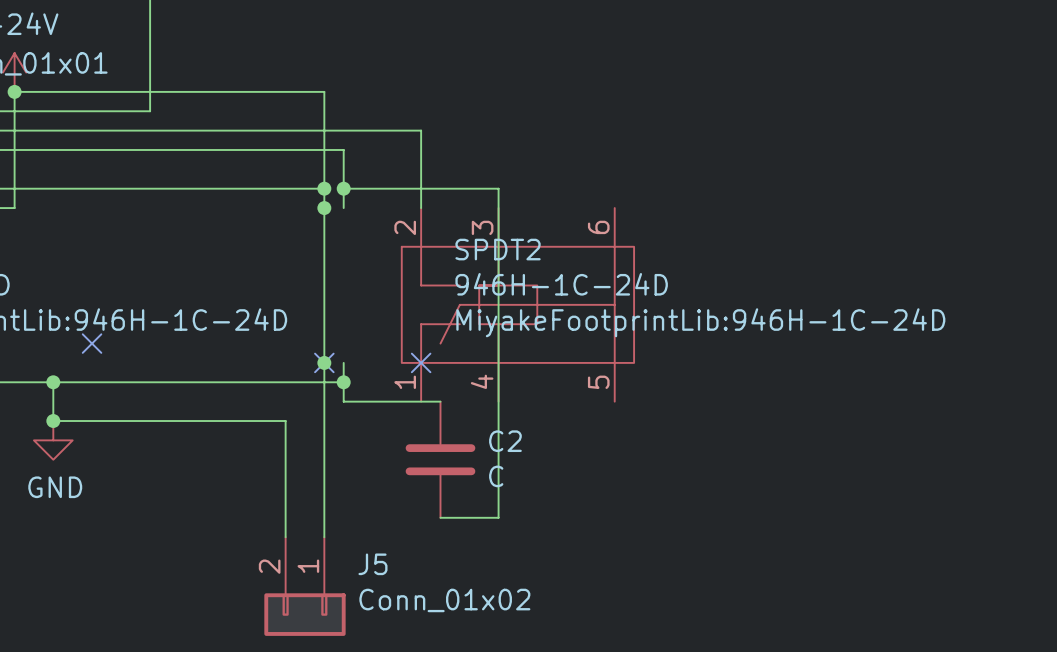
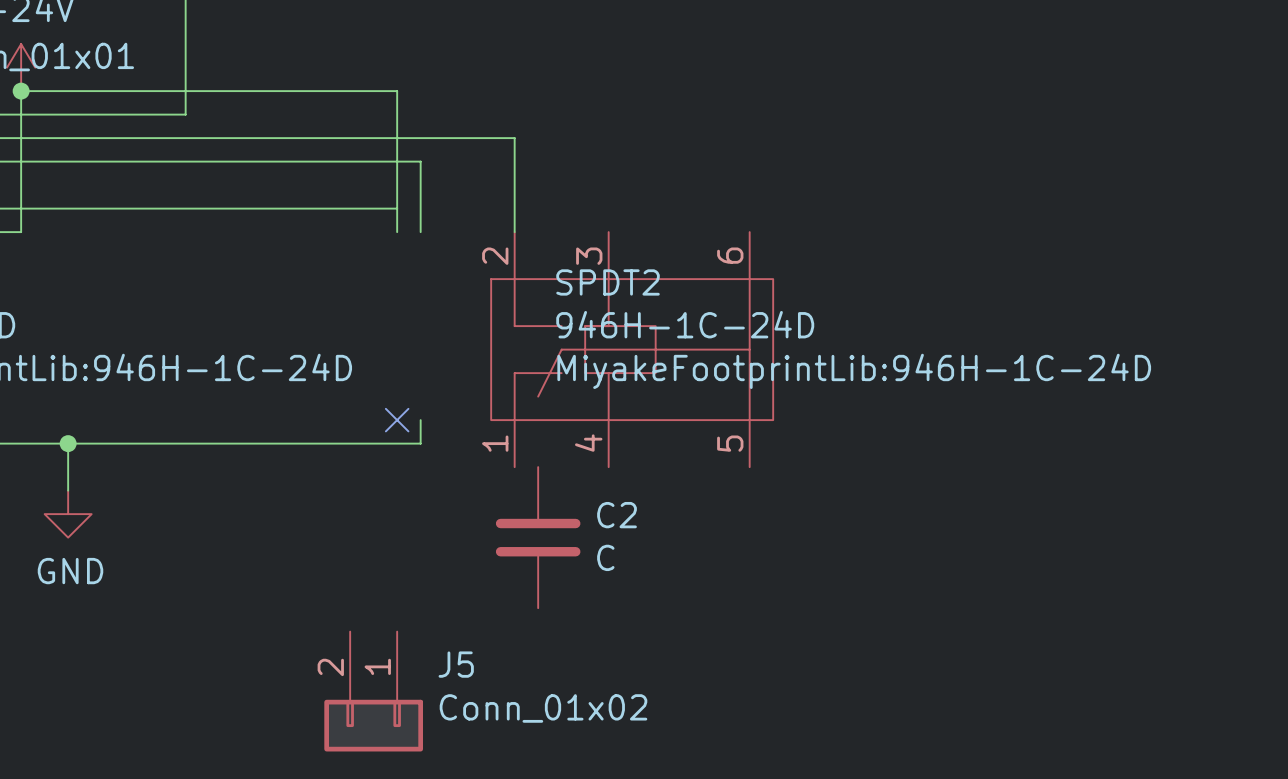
junction: (324, 188) -> none
wire: (343, 188) (498, 188) (498, 517) (440, 517) -> none
junction: (343, 188) -> none
wire: (324, 208) (324, 537) -> none
junction: (324, 208) -> none
no-connect mark: (92, 343) -> none
junction: (324, 362) -> none
no-connect mark: (421, 362) -> none
wire: (343, 382) (343, 401) (440, 401) -> none
junction: (343, 382) -> none
wire: (53, 421) (285, 421) (285, 537) -> none
junction: (53, 421) -> none

